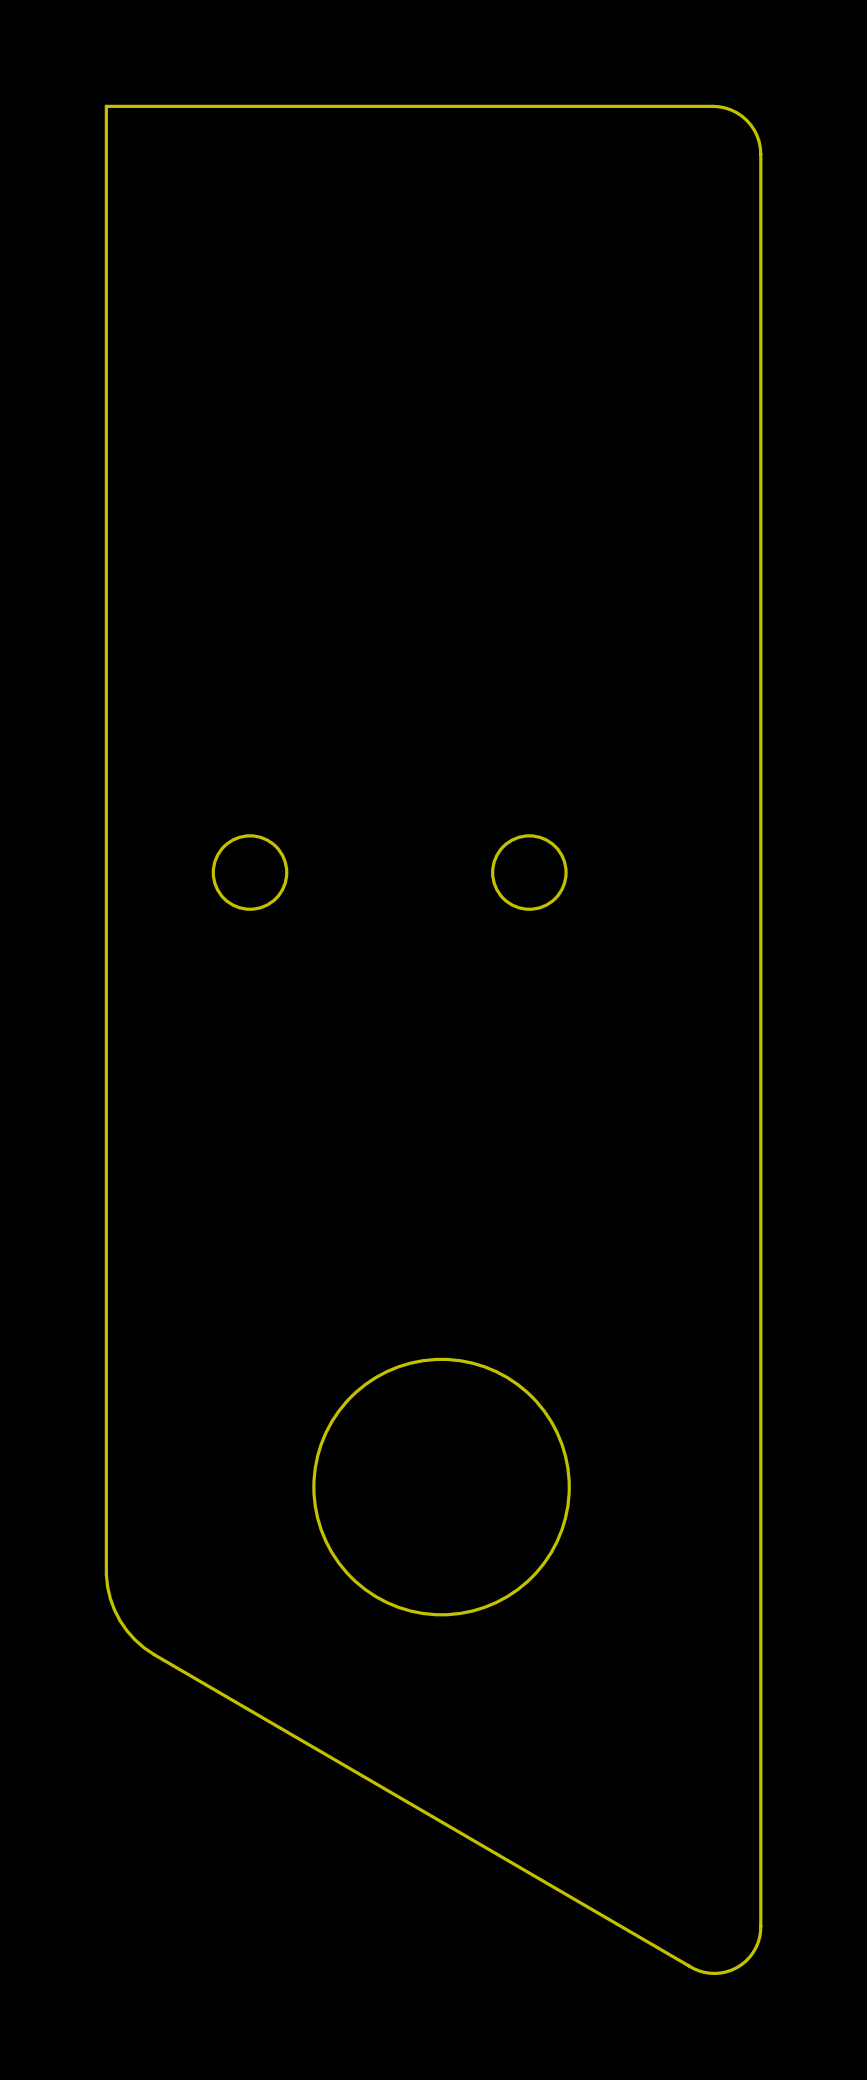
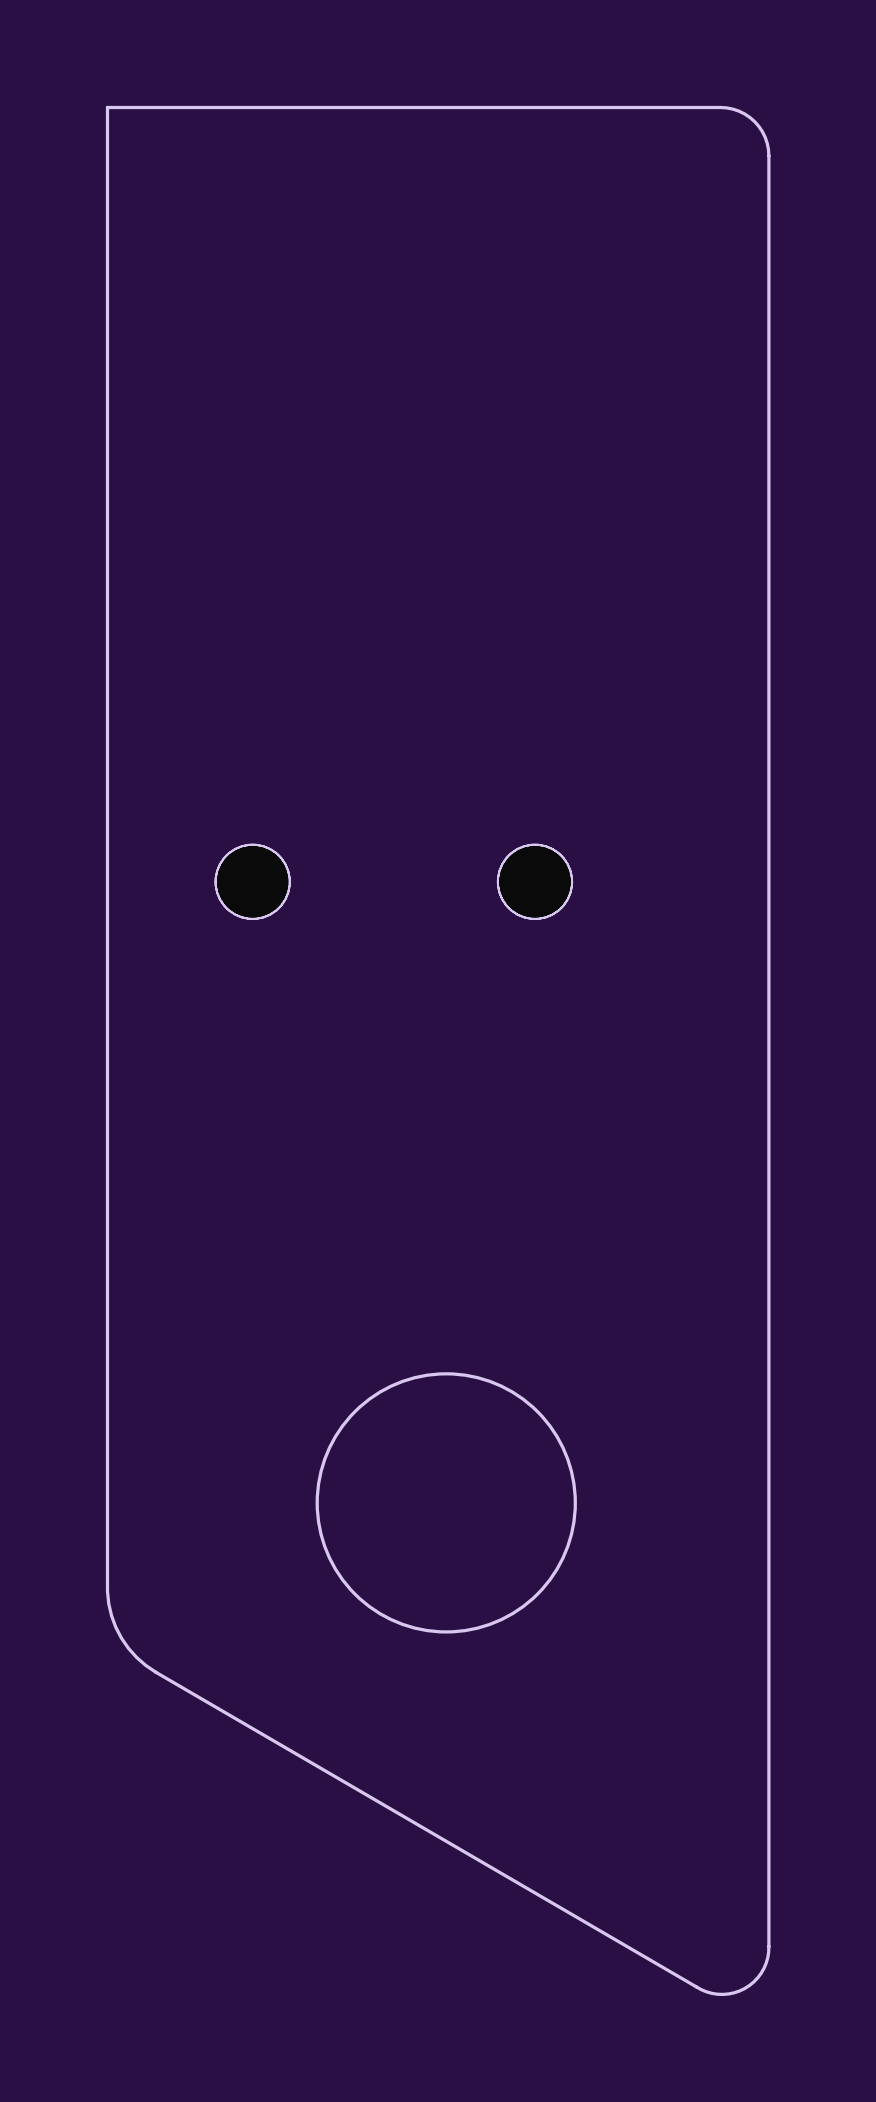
drawing: [211, 834, 289, 911] -> none
drawing: [491, 834, 568, 911] -> none
part: none -> (252, 881)
part: none -> (534, 881)

